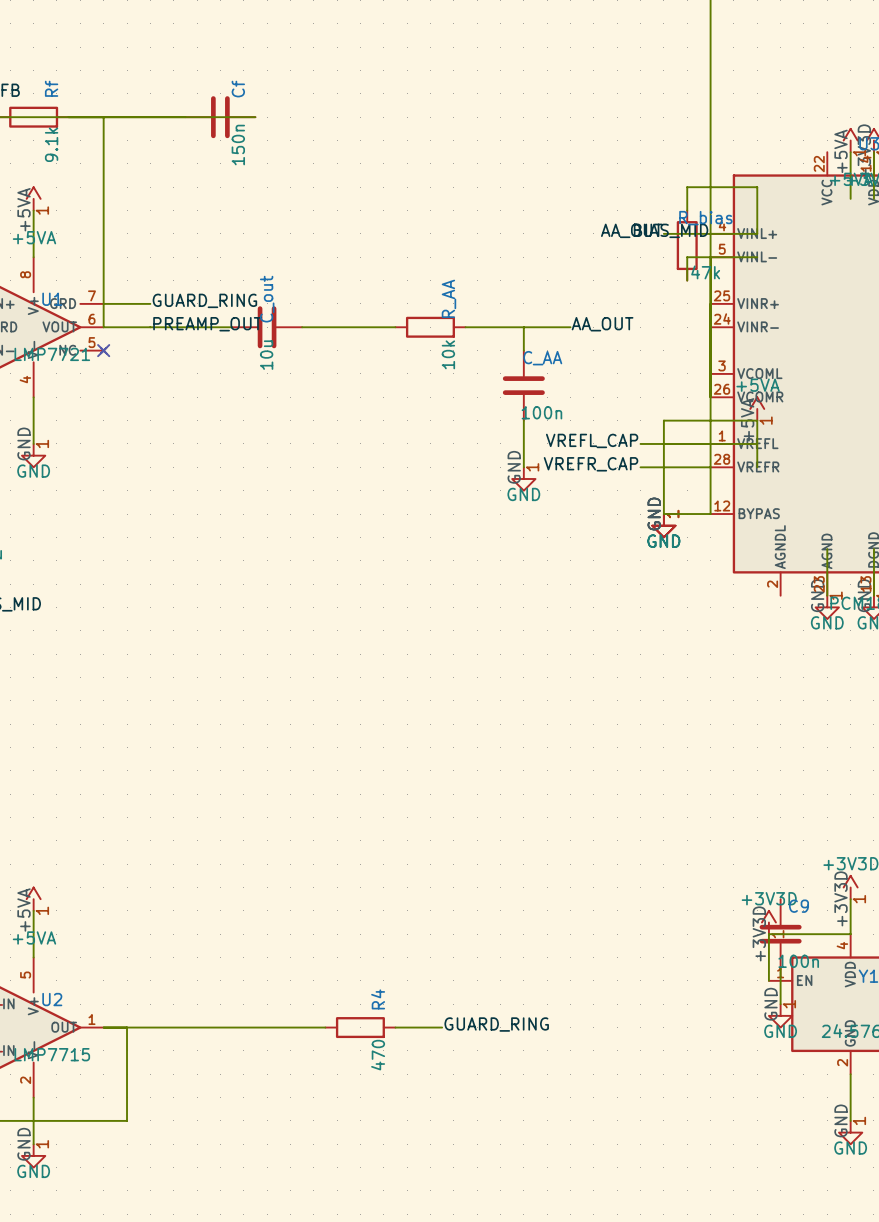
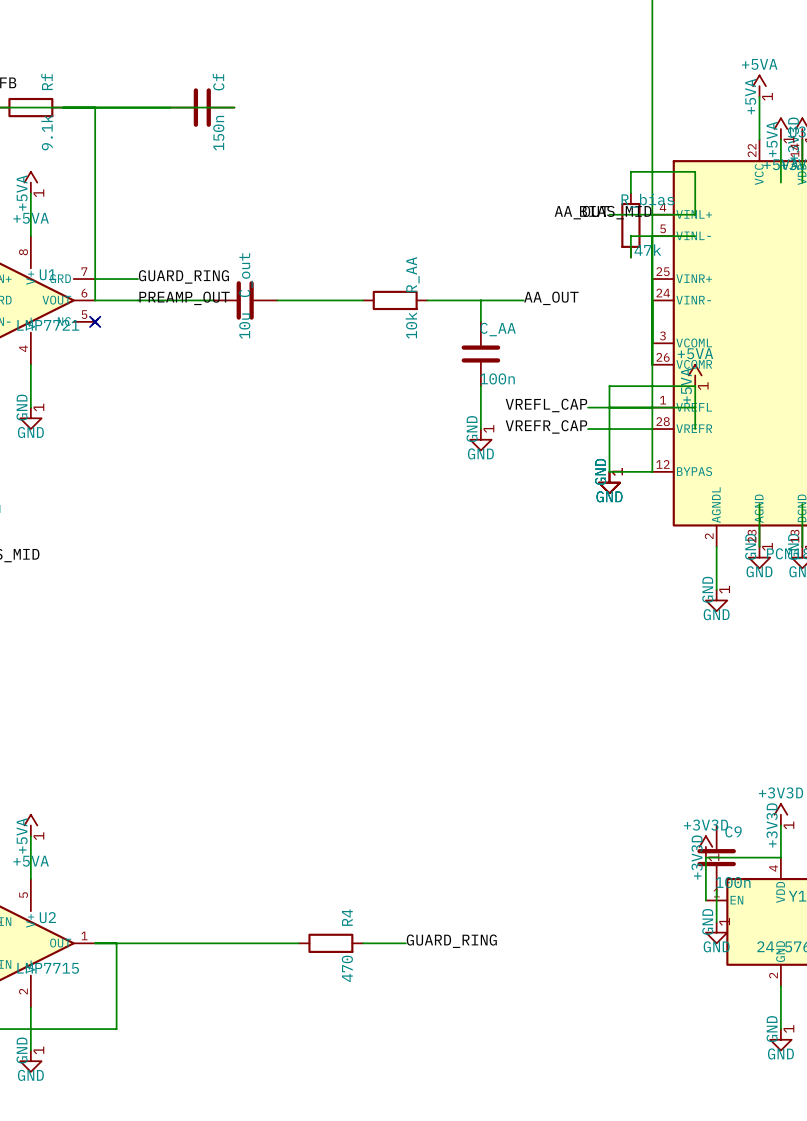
power symbol: none -> +5VA (759, 86)
wire: none -> (759, 96) (759, 139)
wire: none -> (716, 546) (716, 589)
power symbol: none -> GND (716, 600)

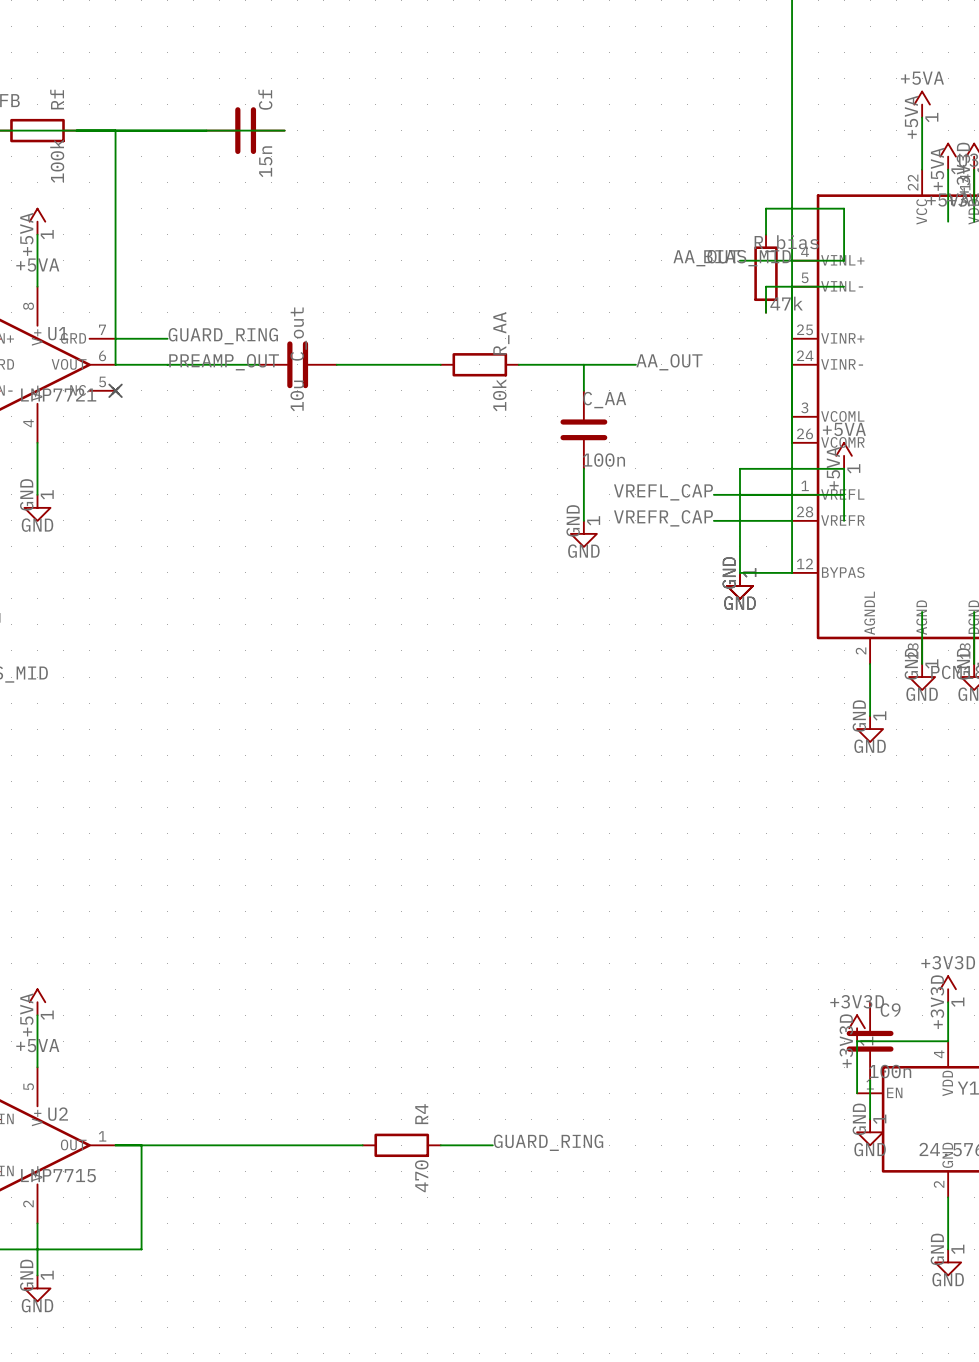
Rf value: 9.1k (47, 132) -> 100k (57, 161)
Cf value: 150n (218, 133) -> 15n (265, 161)

